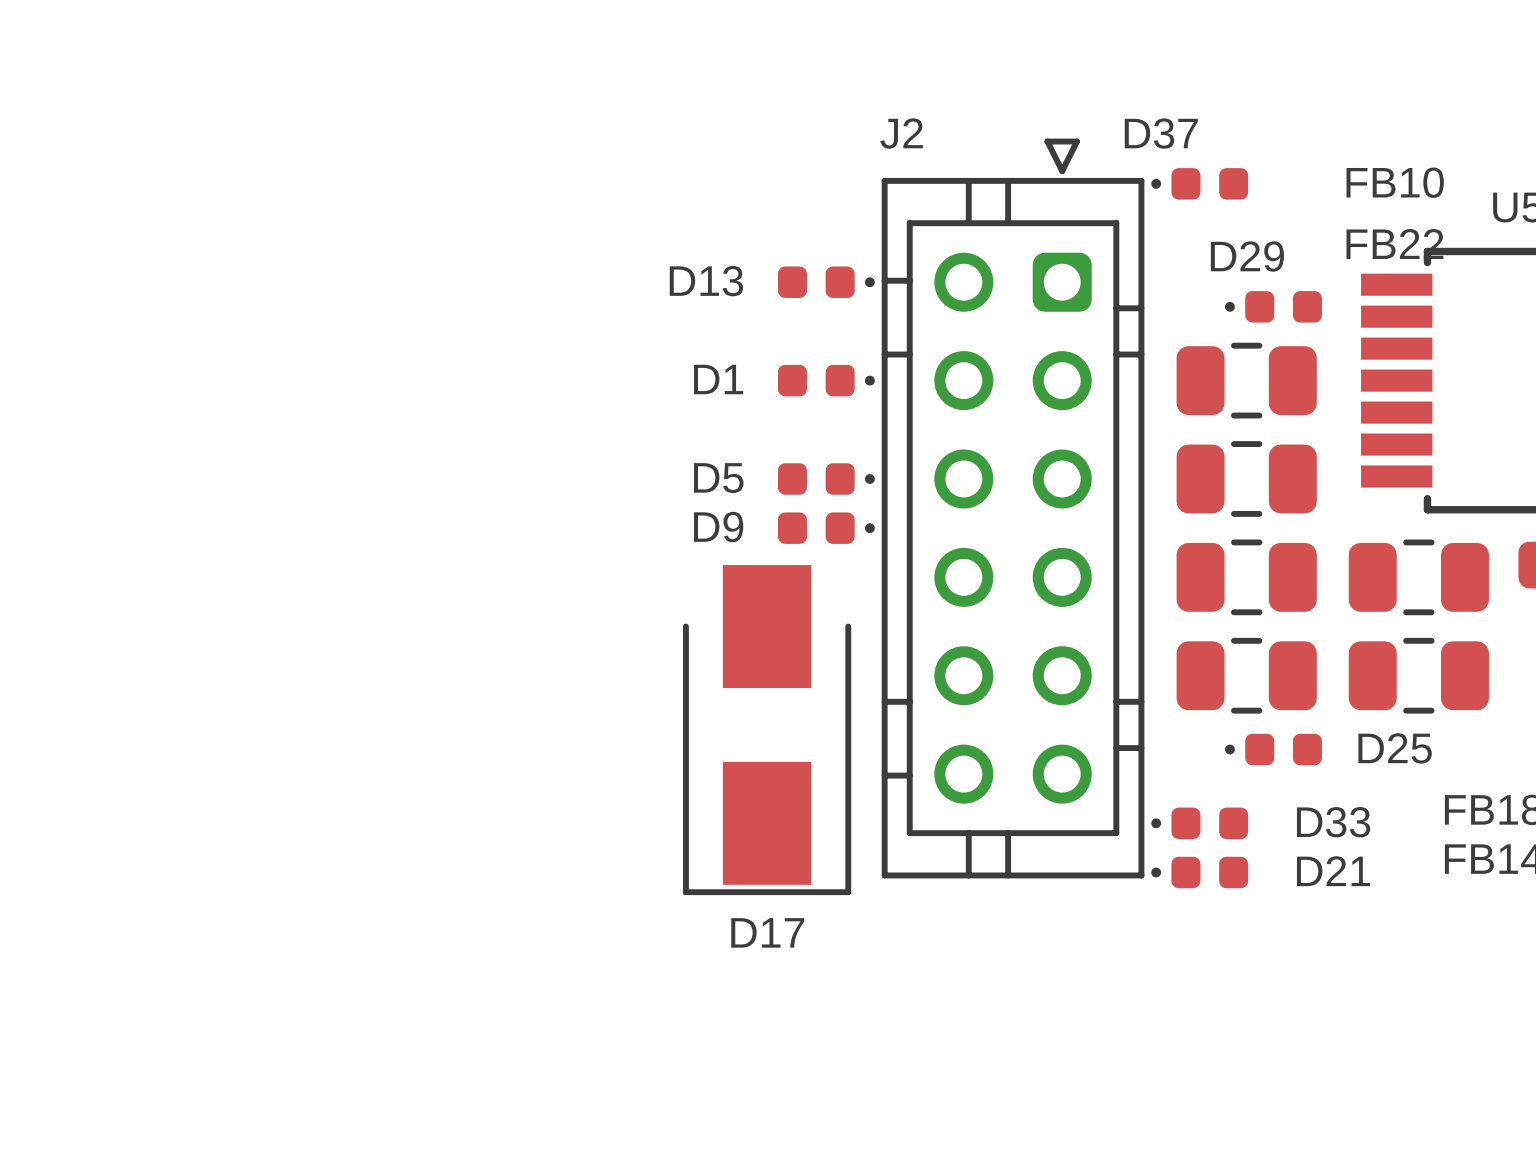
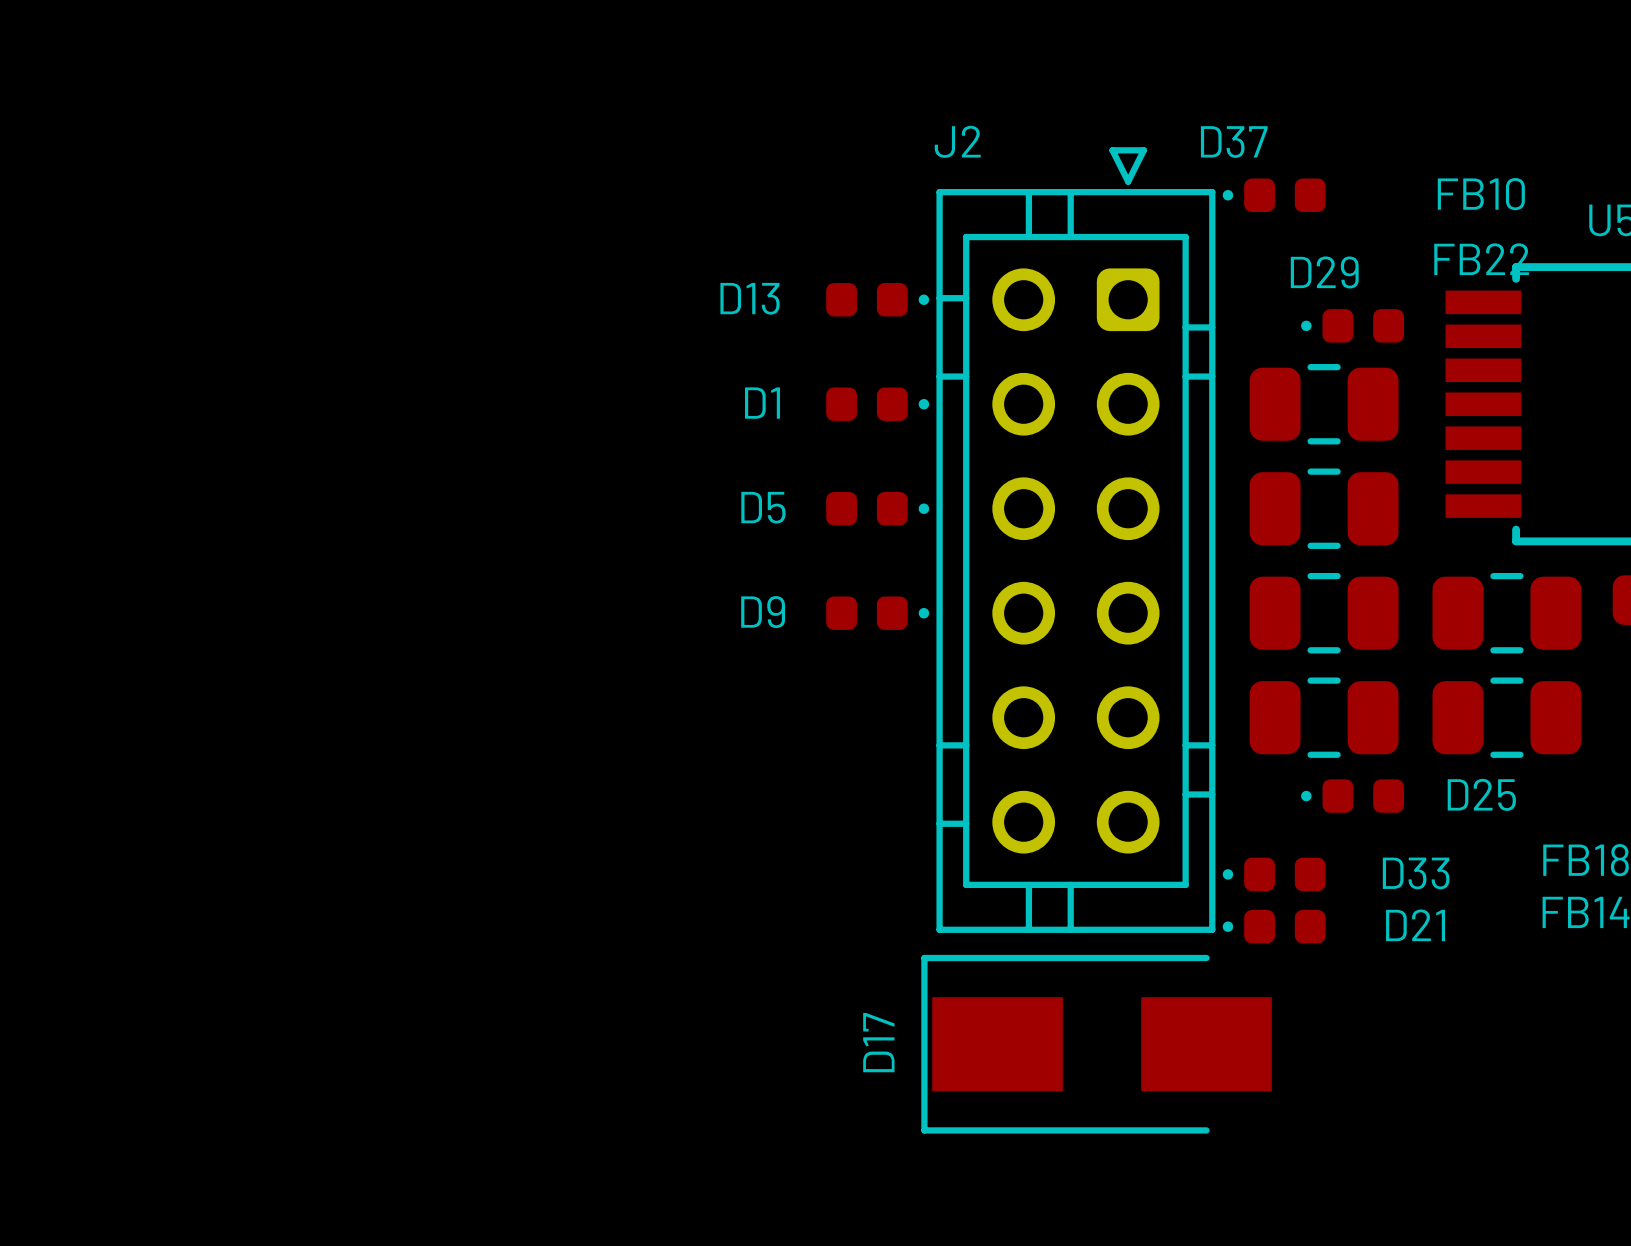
D9 position: (826, 528) -> (877, 613)
D17 rotation: 0° (767, 730) -> 90° clockwise (1096, 1044)
D17 position: (767, 730) -> (1096, 1044)

